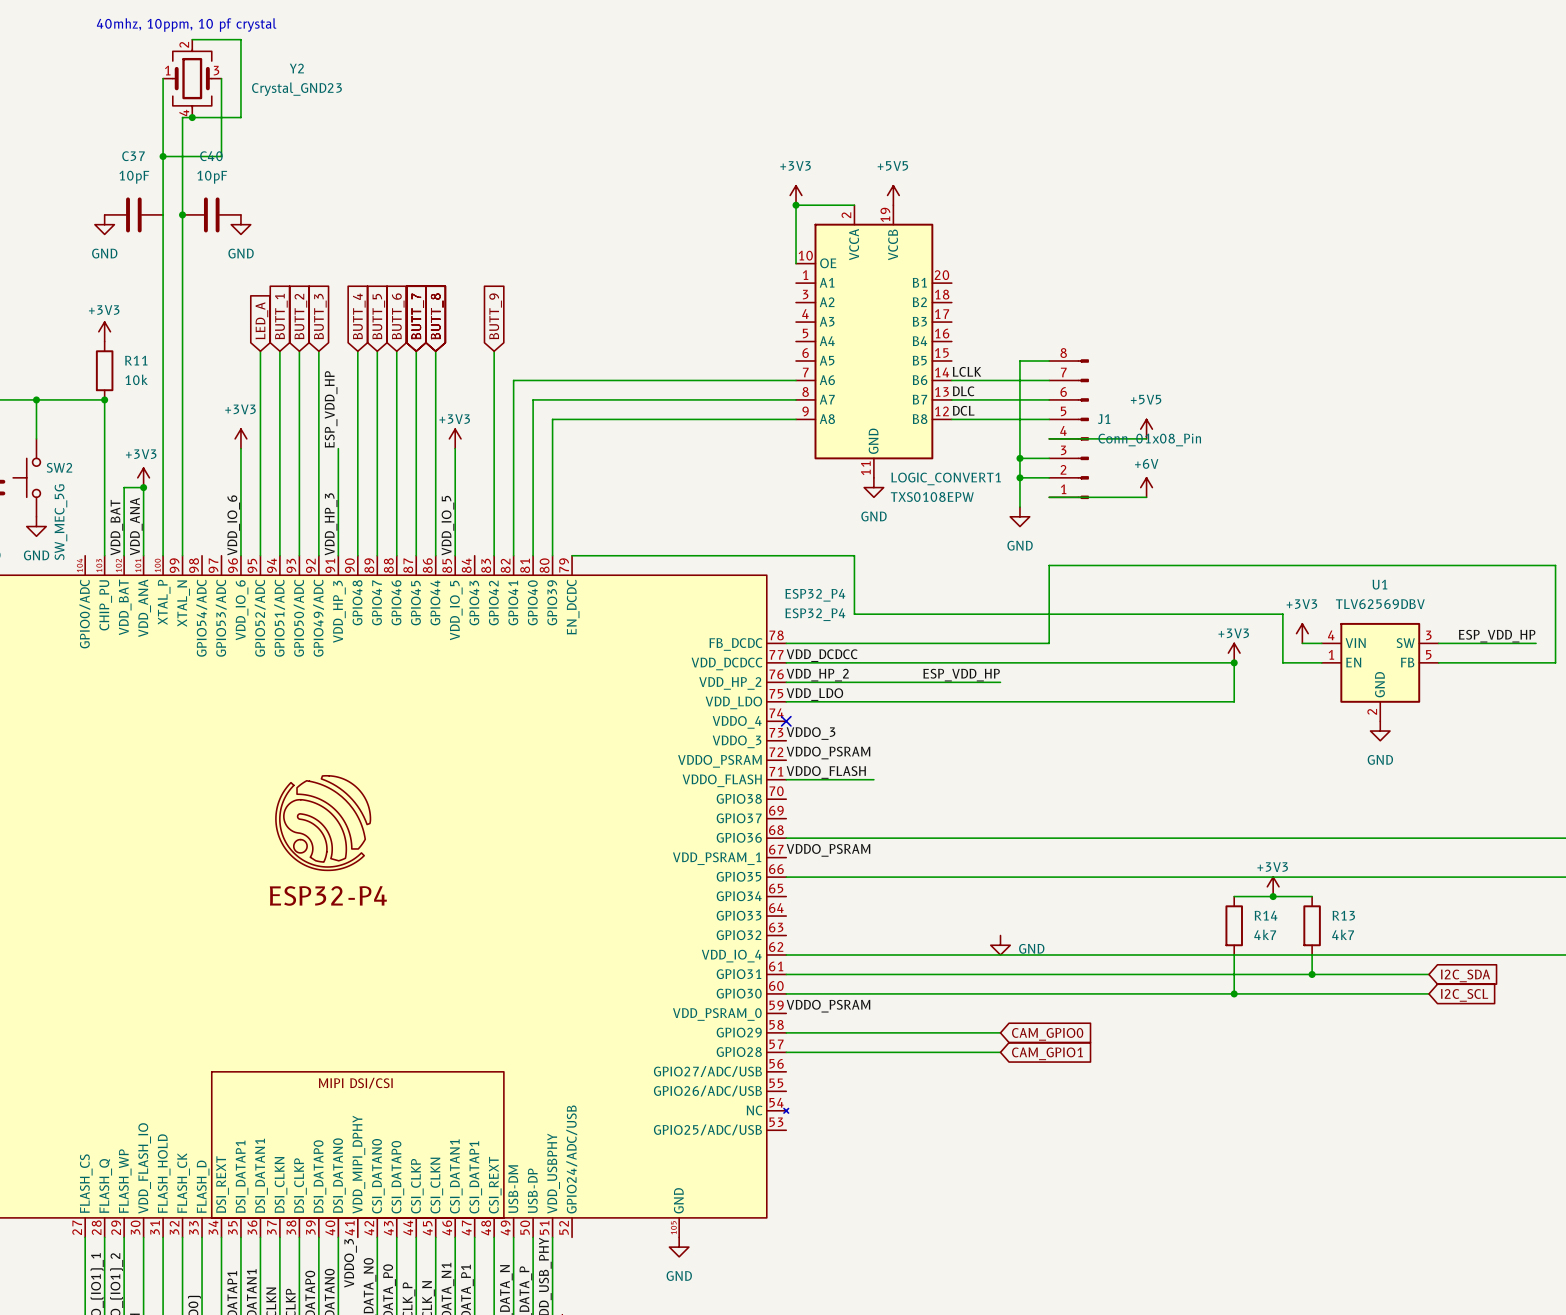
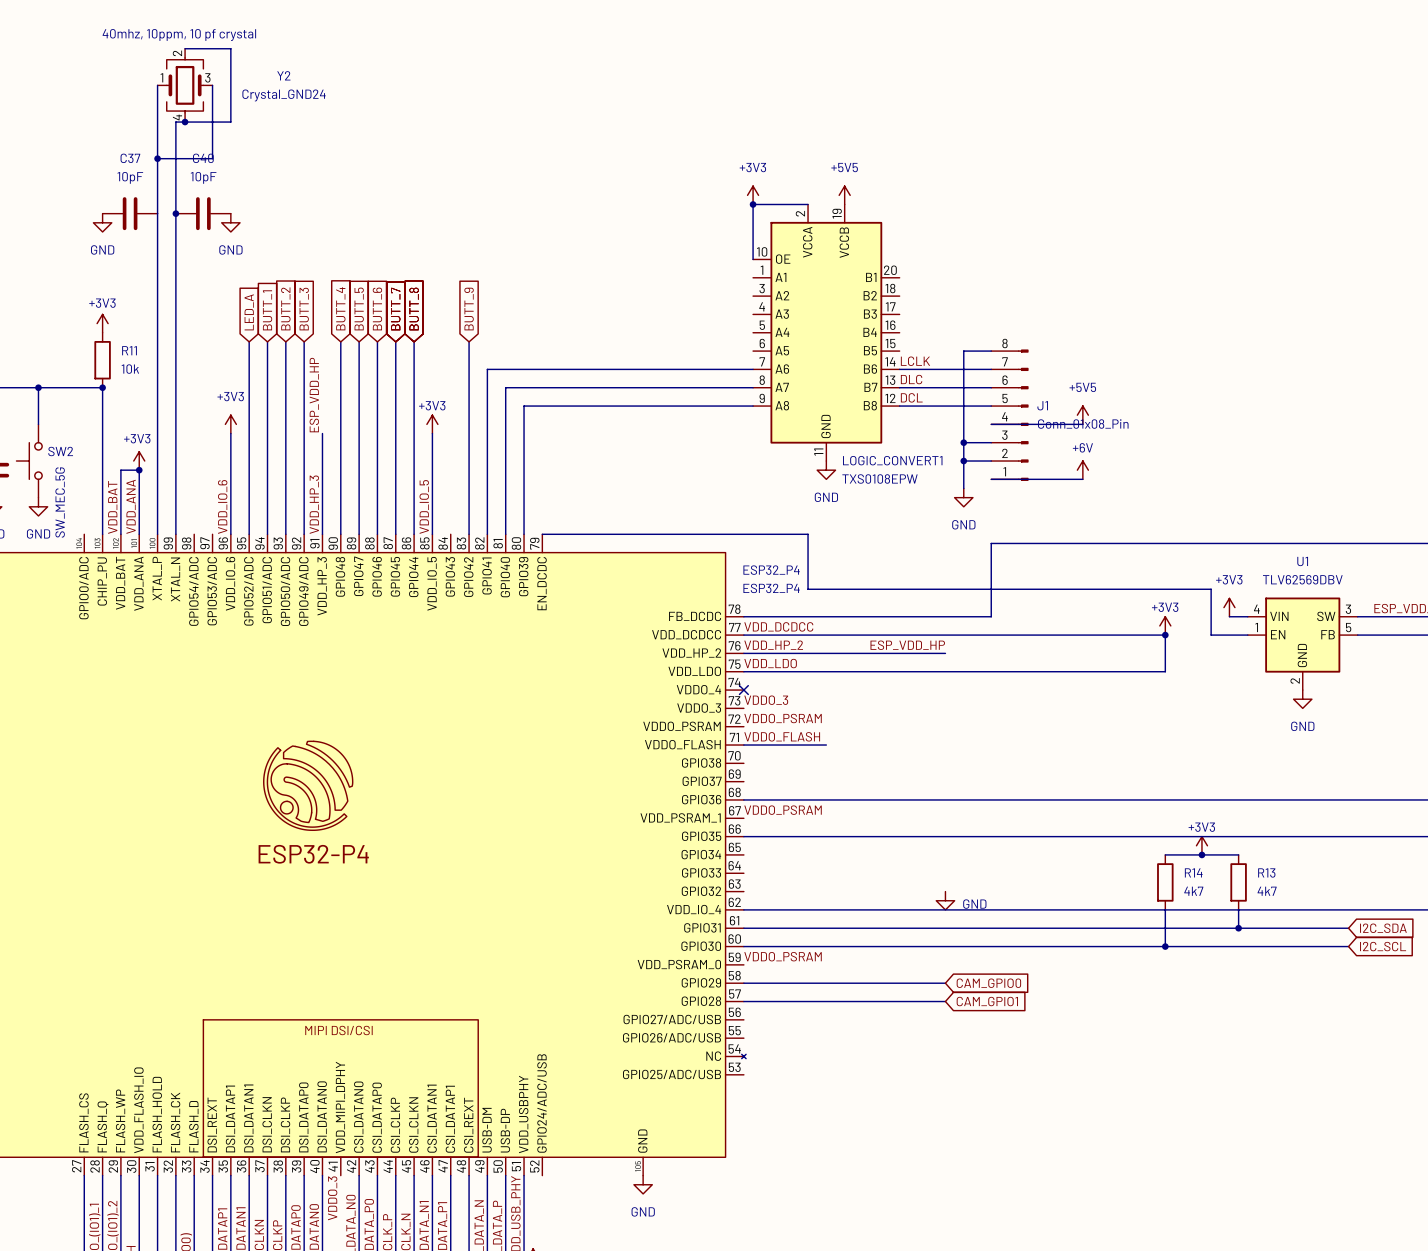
Y2 value: Crystal_GND23 (296, 89) -> Crystal_GND24 (284, 95)

